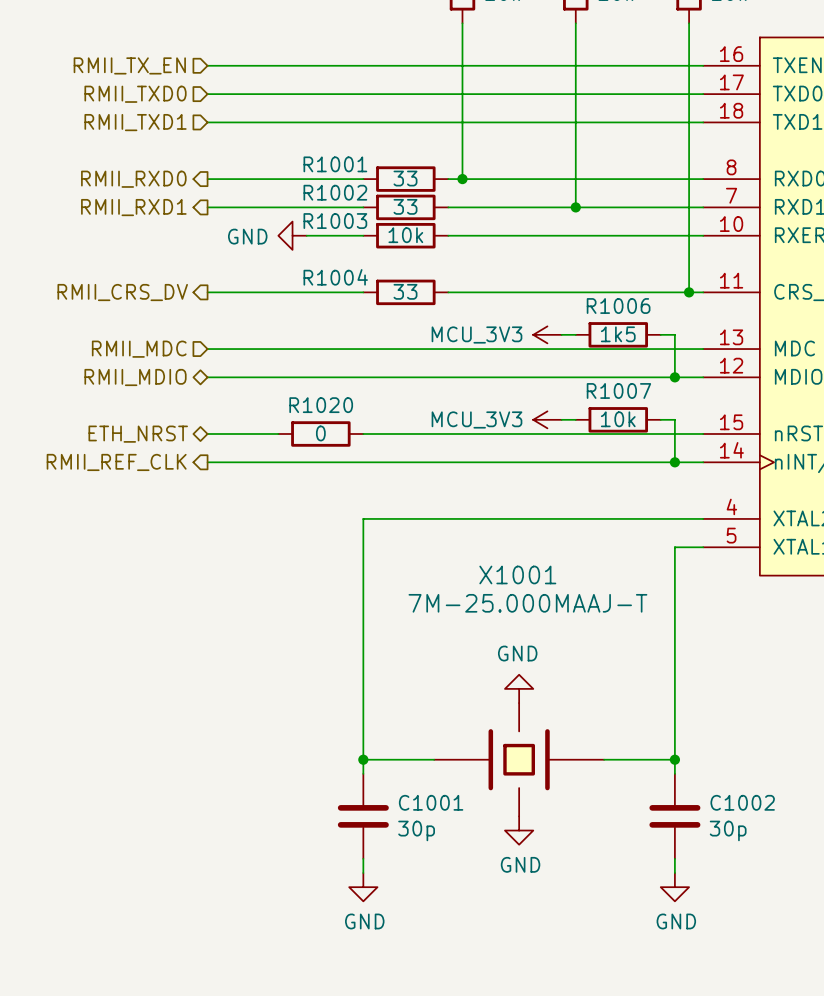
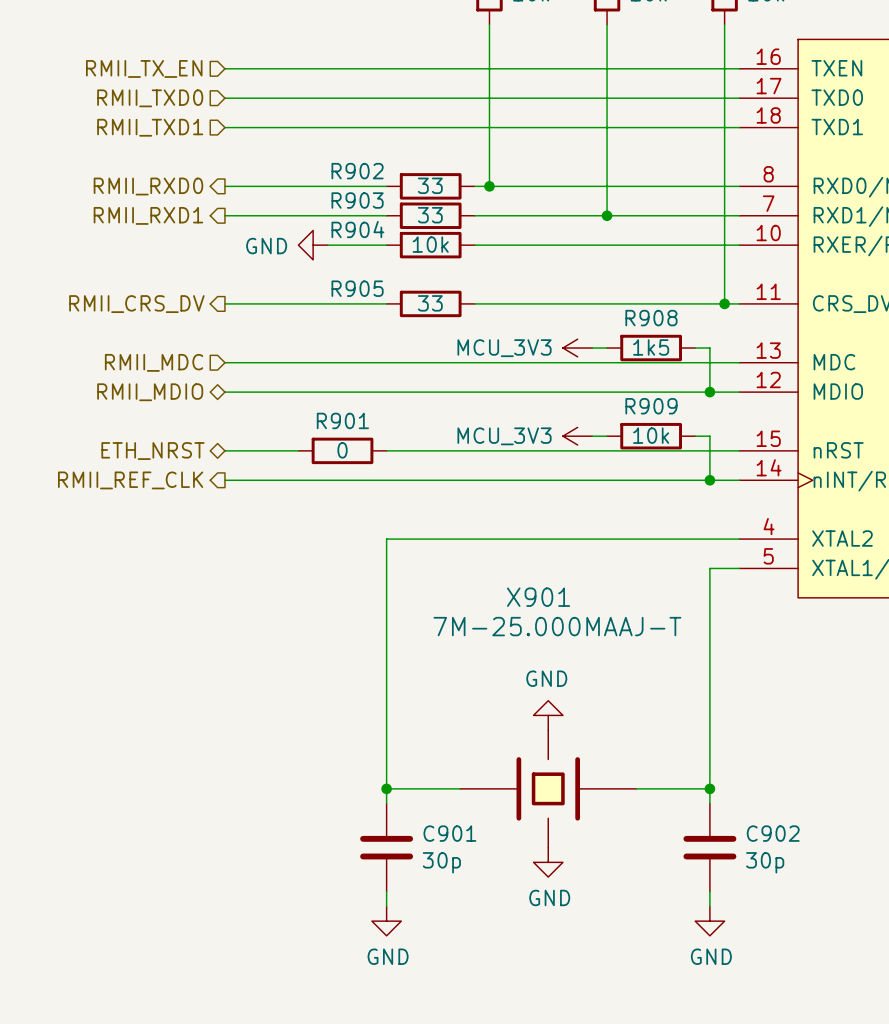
R1001 name: R1001 (335, 164) -> R902 (357, 171)
R1002 name: R1002 (335, 192) -> R903 (357, 200)
R1003 name: R1003 (335, 221) -> R904 (357, 229)
R1004 name: R1004 (335, 277) -> R905 (357, 288)
R1006 name: R1006 (618, 306) -> R908 (651, 318)
R1007 name: R1007 (618, 390) -> R909 (651, 406)
R1020 name: R1020 (321, 405) -> R901 (342, 420)
X1001 name: X1001 (517, 574) -> X901 (538, 597)
C1001 name: C1001 (431, 802) -> C901 (449, 833)
C1002 name: C1002 (742, 802) -> C902 (773, 833)

